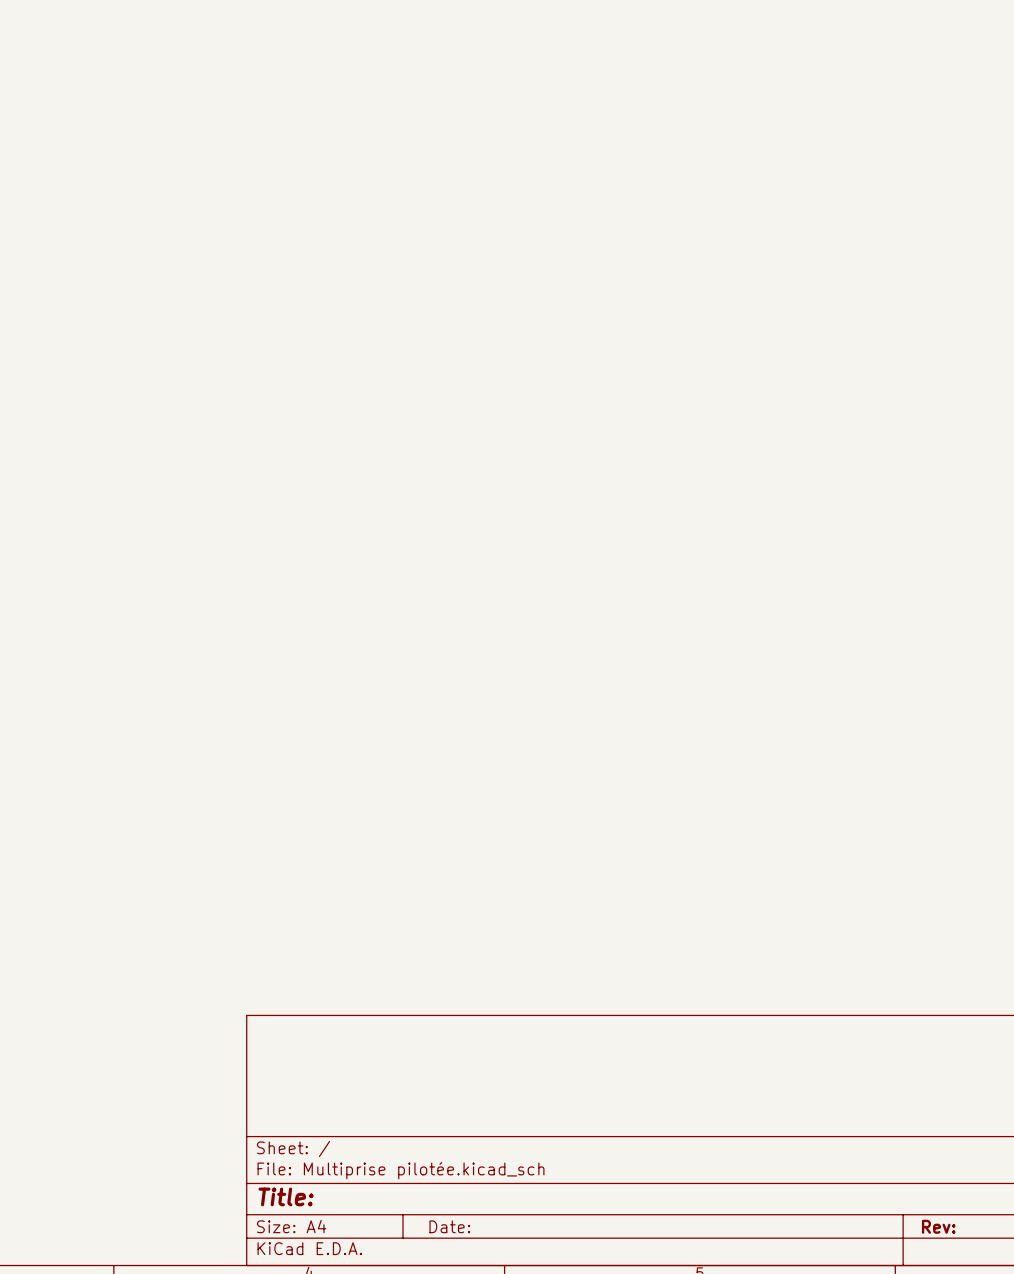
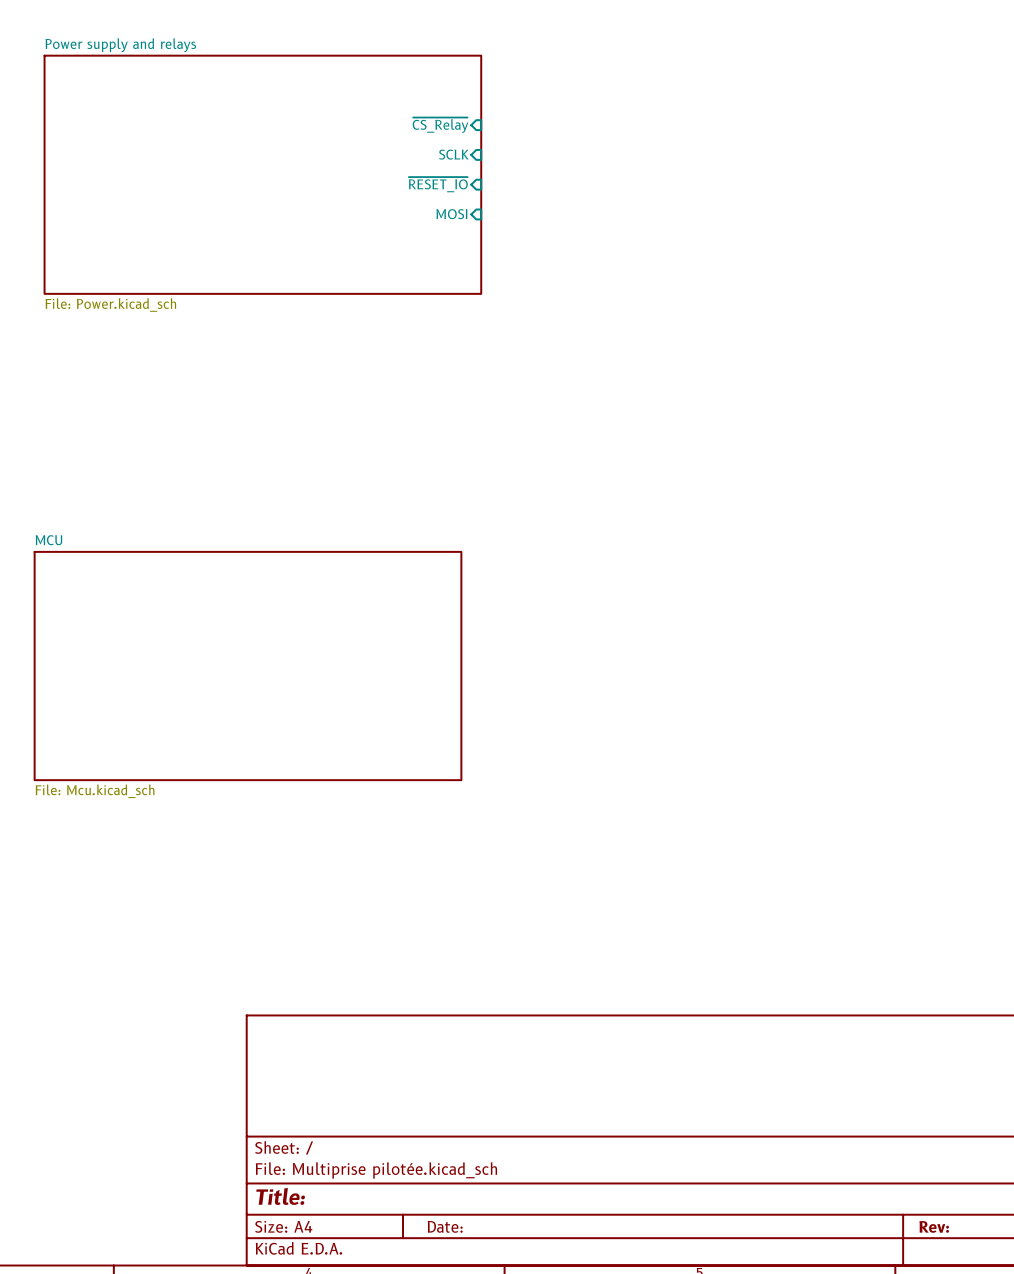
sheet pin: none -> ~{CS_Relay} (440, 125)
sheet pin: none -> SCLK (453, 154)
sheet Power supply and relays: none -> File: Power.kicad_sch (262, 174)
sheet pin: none -> ~{RESET_IO} (438, 184)
sheet pin: none -> MOSI (451, 214)
sheet MCU: none -> File: Mcu.kicad_sch (248, 666)

